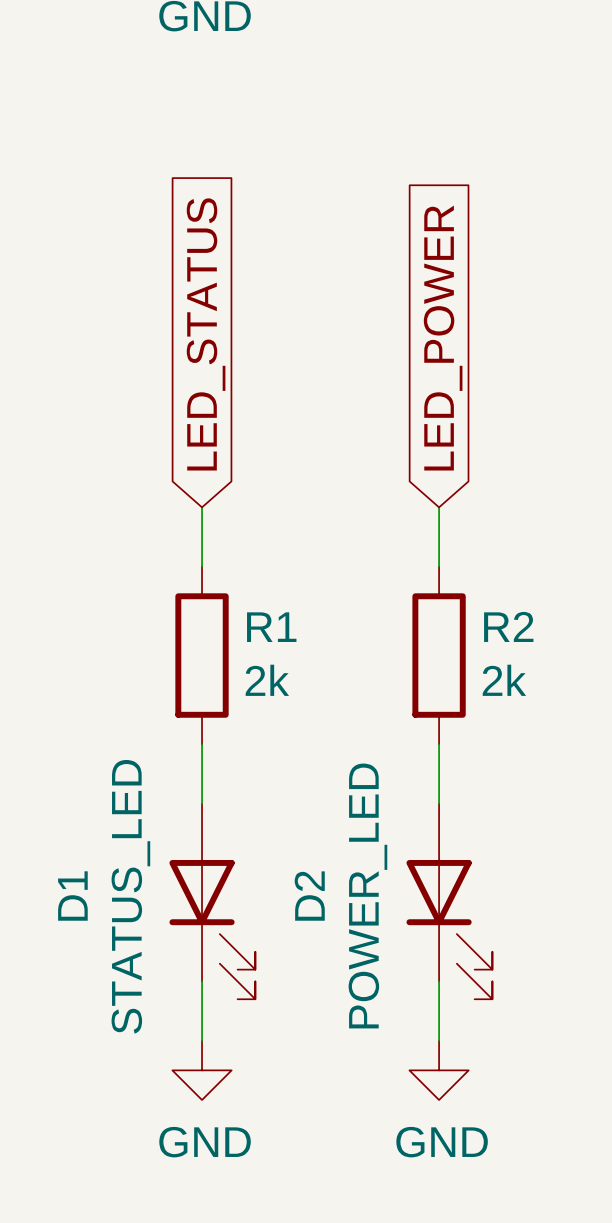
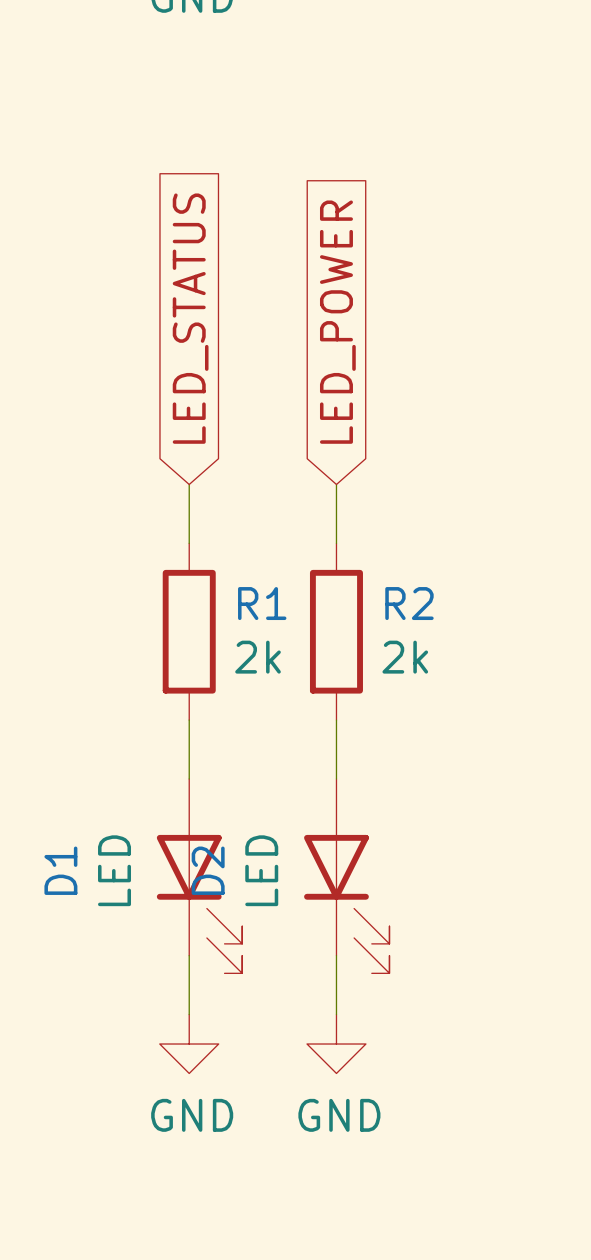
global label position: LED_POWER (443, 338) -> LED_POWER (337, 322)
wire: (439, 507) (439, 566) -> (336, 484) (336, 543)
R2 position: (439, 655) -> (336, 631)
wire: (439, 744) (439, 803) -> (336, 720) (336, 778)
D2 value: POWER_LED (367, 895) -> LED (261, 870)
D1 value: STATUS_LED (130, 896) -> LED (114, 870)
D2 position: (449, 901) -> (346, 876)
wire: (439, 981) (439, 1040) -> (336, 955) (336, 1014)
power symbol position: GND (439, 1070) -> GND (336, 1044)

